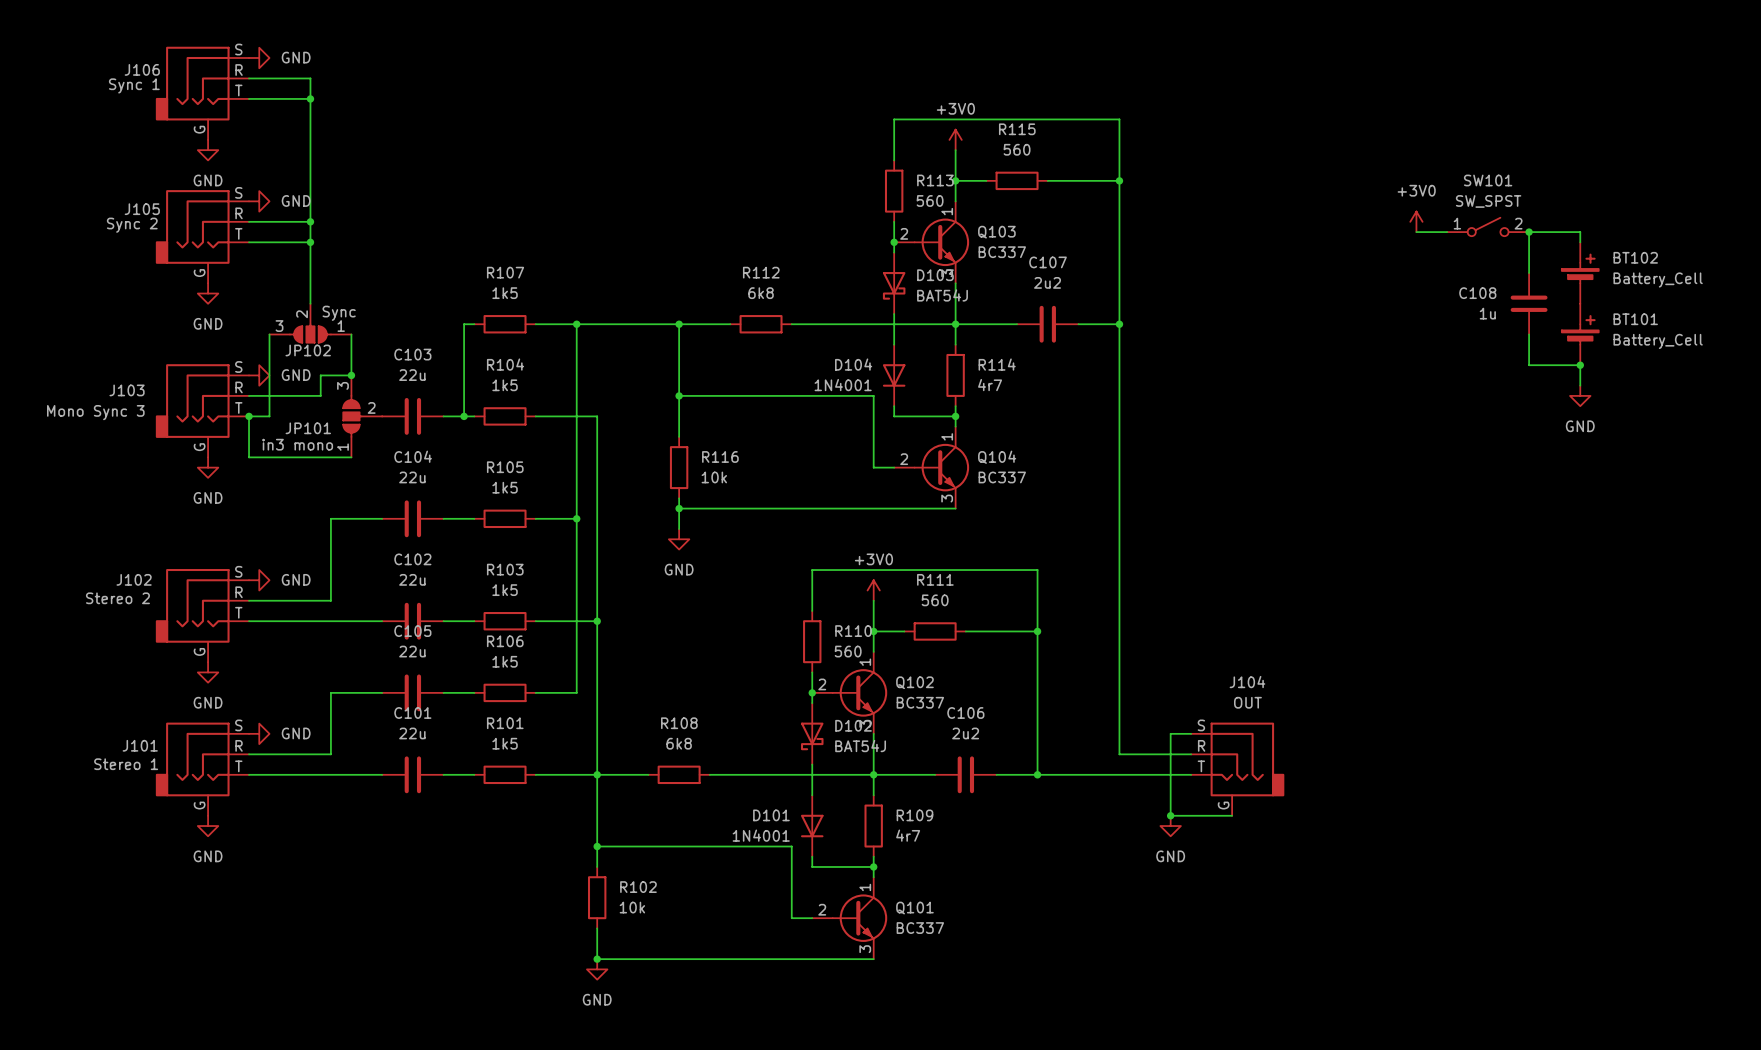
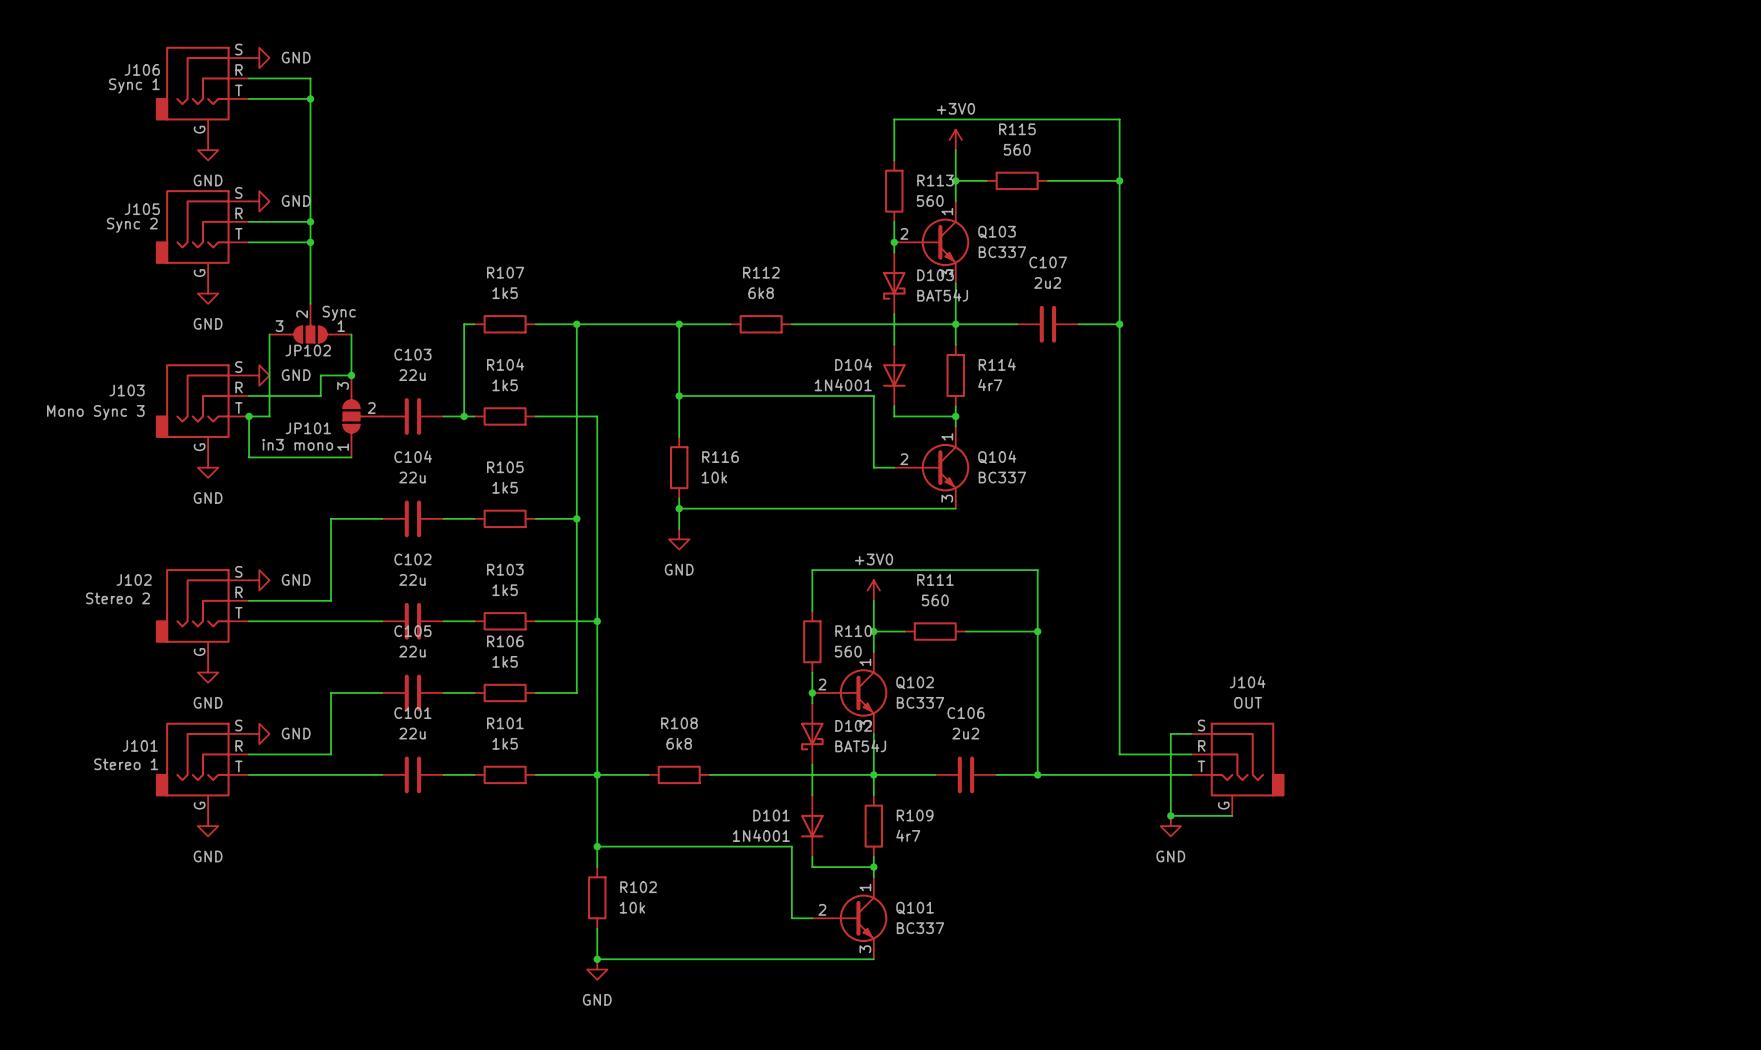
power symbol: +3V0 (1416, 221) -> none
SW101: SW_SPST (1488, 226) -> none
wire: (1416, 232) (1447, 232) -> none
junction: (1529, 232) -> none
wire: (1580, 242) (1580, 232) (1529, 232) (1529, 273) -> none
BT102: Battery_Cell (1580, 273) -> none
C108: 1u (1529, 303) -> none
wire: (1529, 334) (1529, 365) (1580, 365) (1580, 385) -> none
BT101: Battery_Cell (1580, 334) -> none
junction: (1580, 365) -> none
power symbol: GND (1580, 395) -> none

